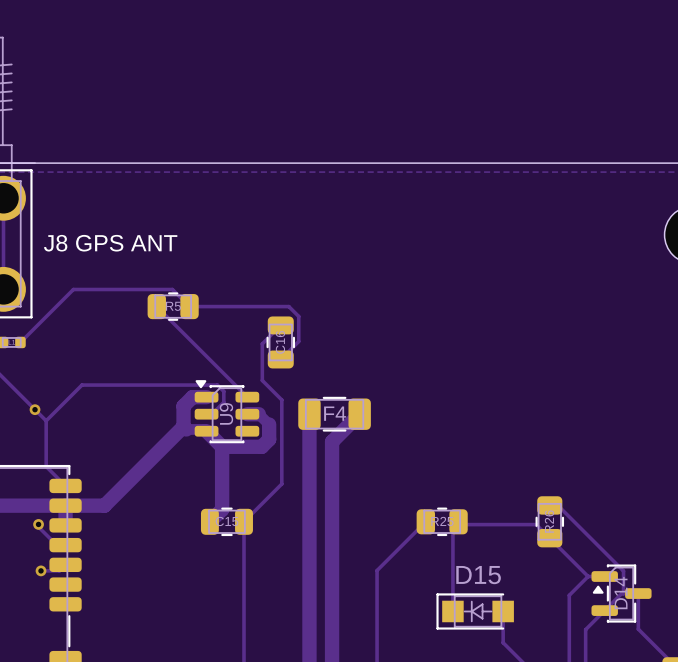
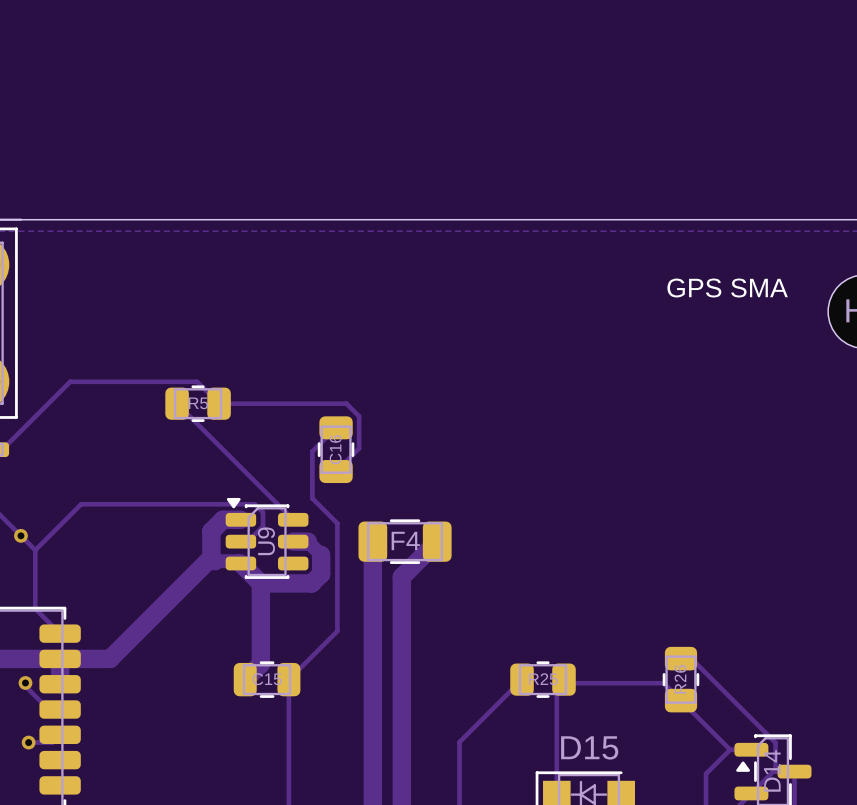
text: none -> GPS SMA (727, 288)
text: J8 GPS ANT (110, 243) -> none

